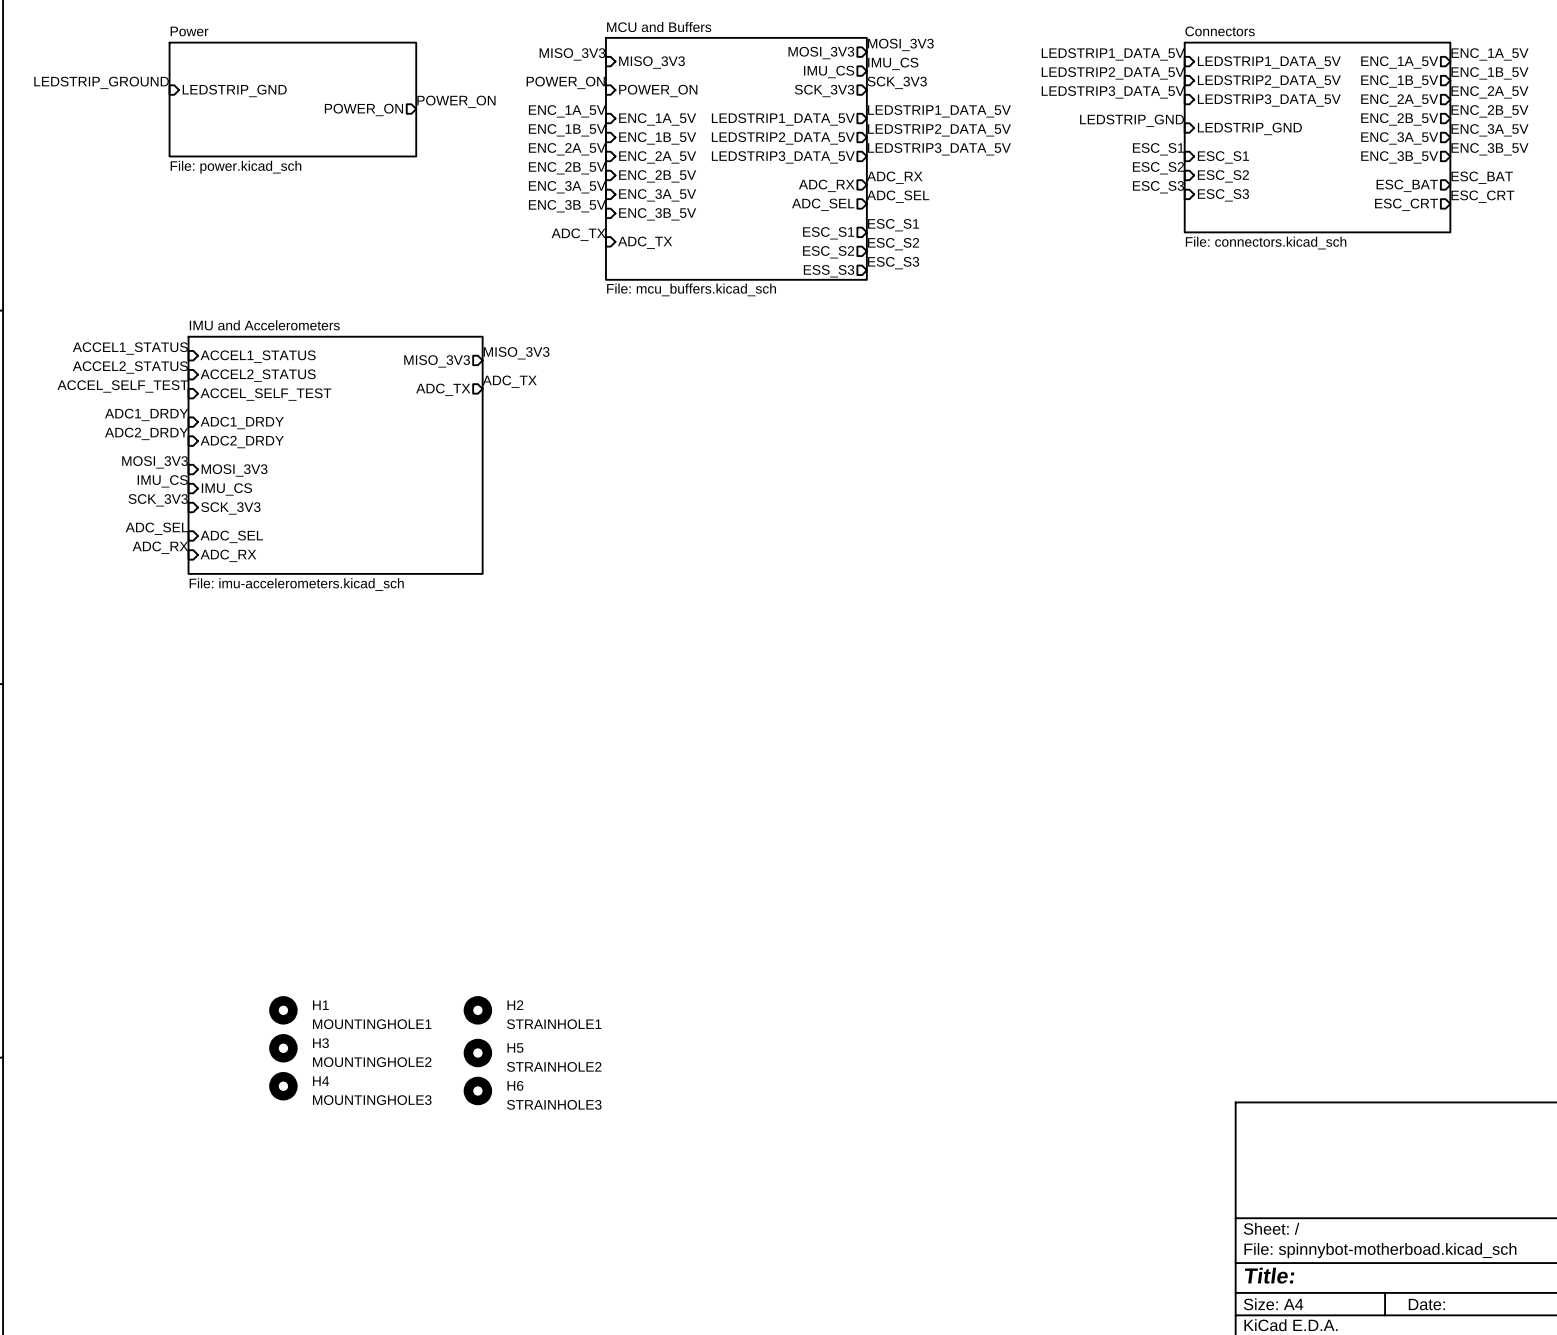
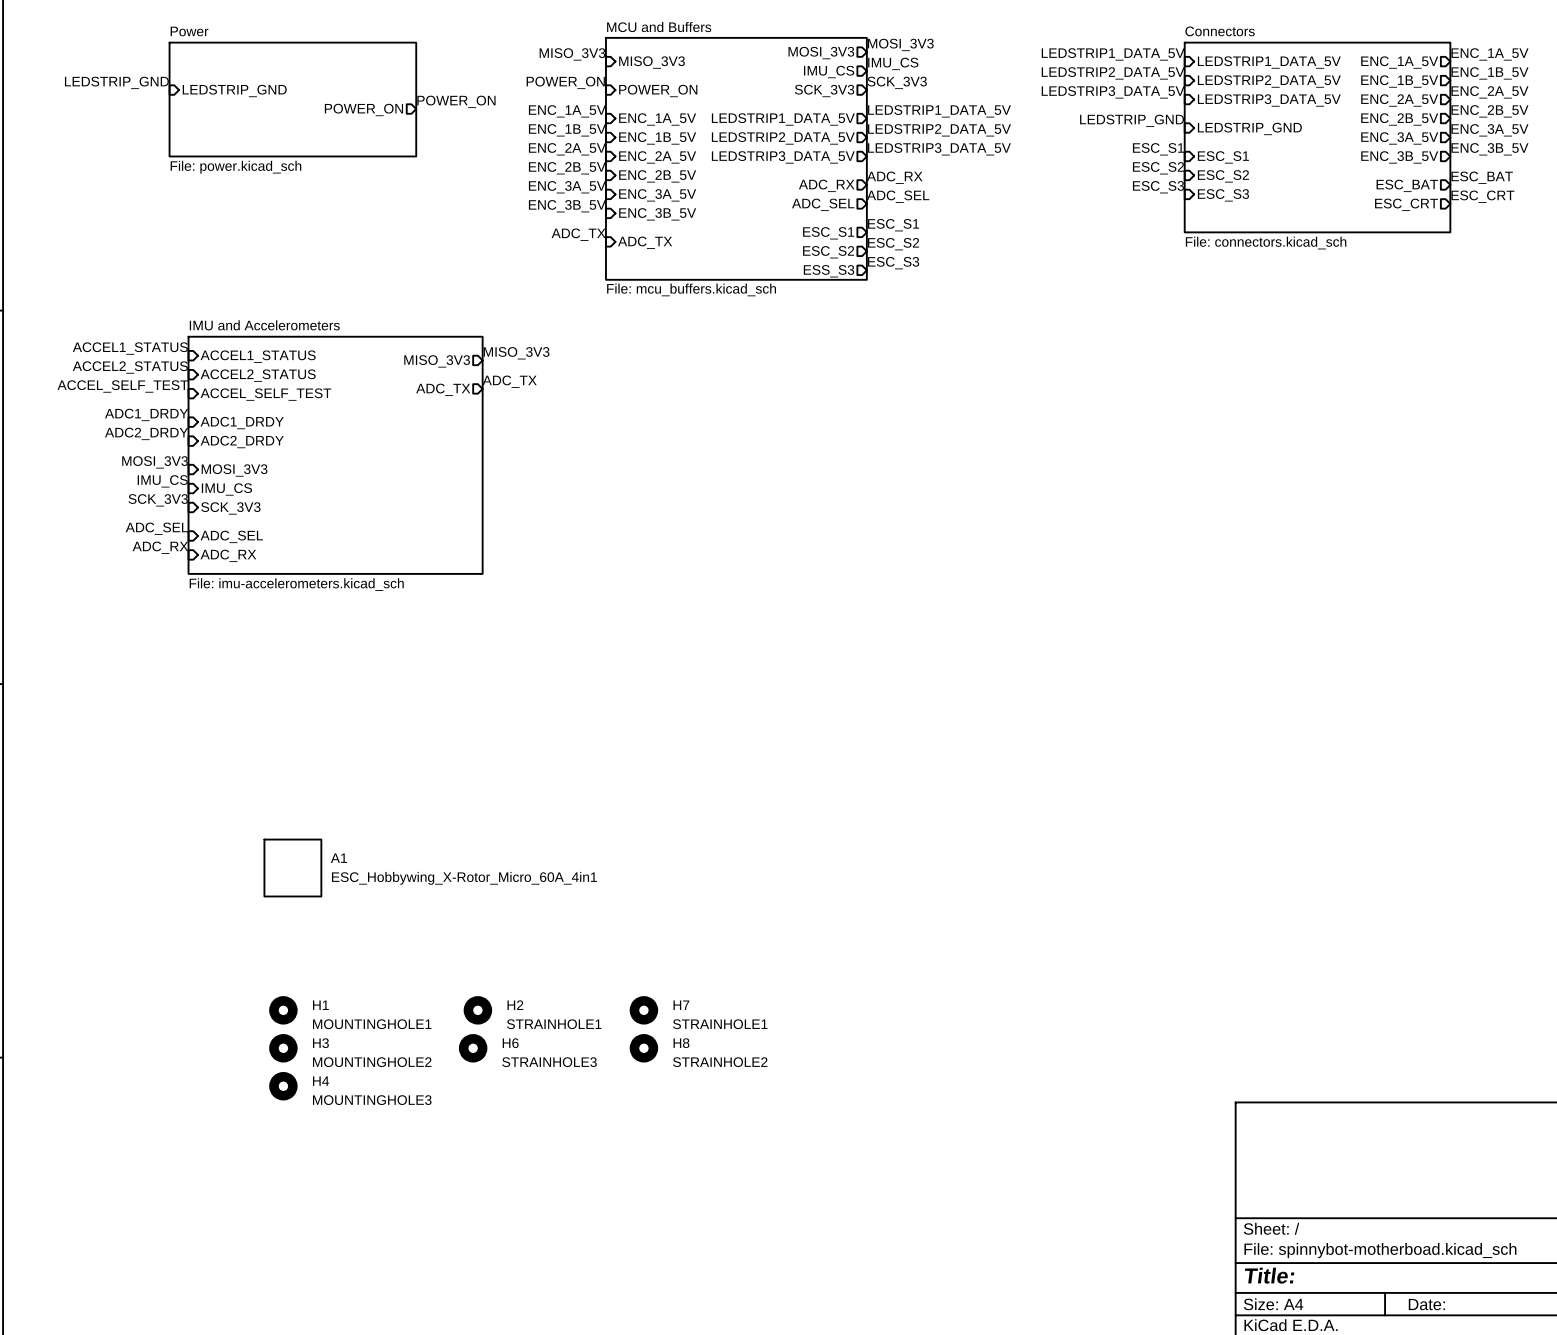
label: LEDSTRIP_GROUND (101, 82) -> LEDSTRIP_GND (116, 82)
A1: none -> ESC_Hobbywing_X-Rotor_Micro_60A_4in1 (292, 868)
H7: none -> STRAINHOLE1 (643, 1010)
H8: none -> STRAINHOLE2 (643, 1048)
H5: STRAINHOLE2 (477, 1053) -> none
H6 position: (477, 1090) -> (473, 1048)

